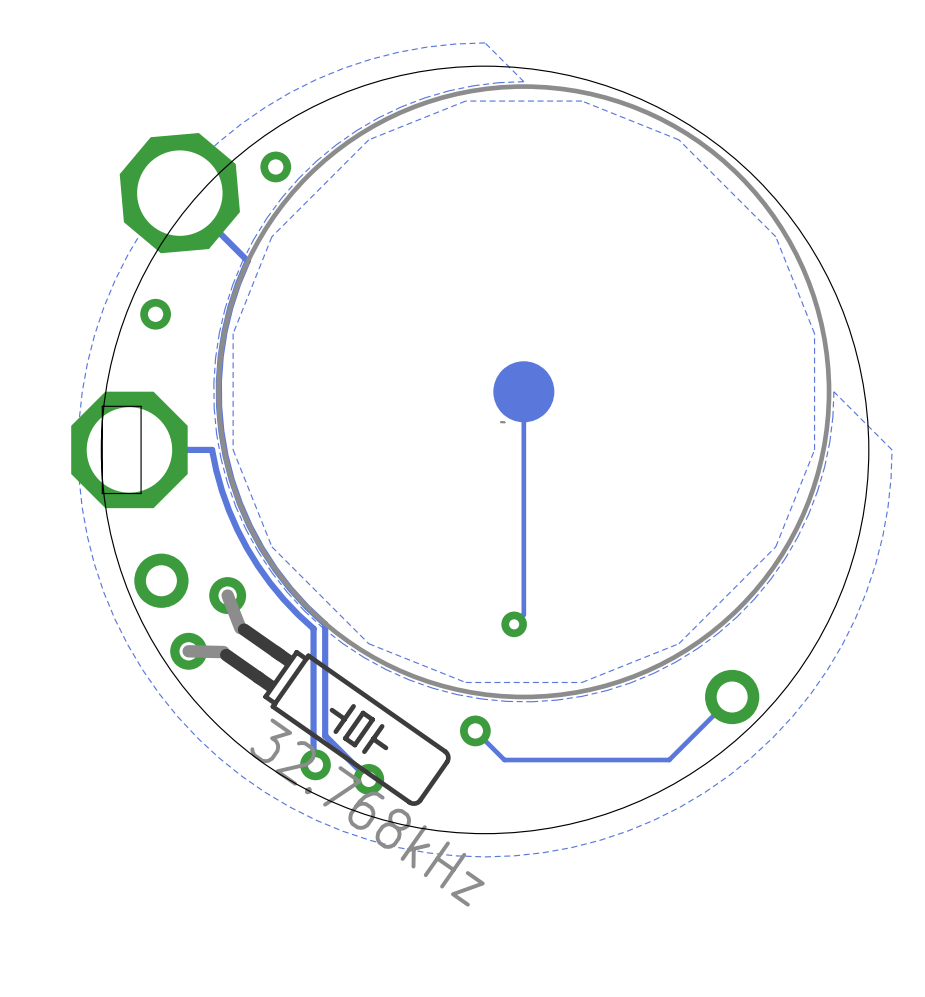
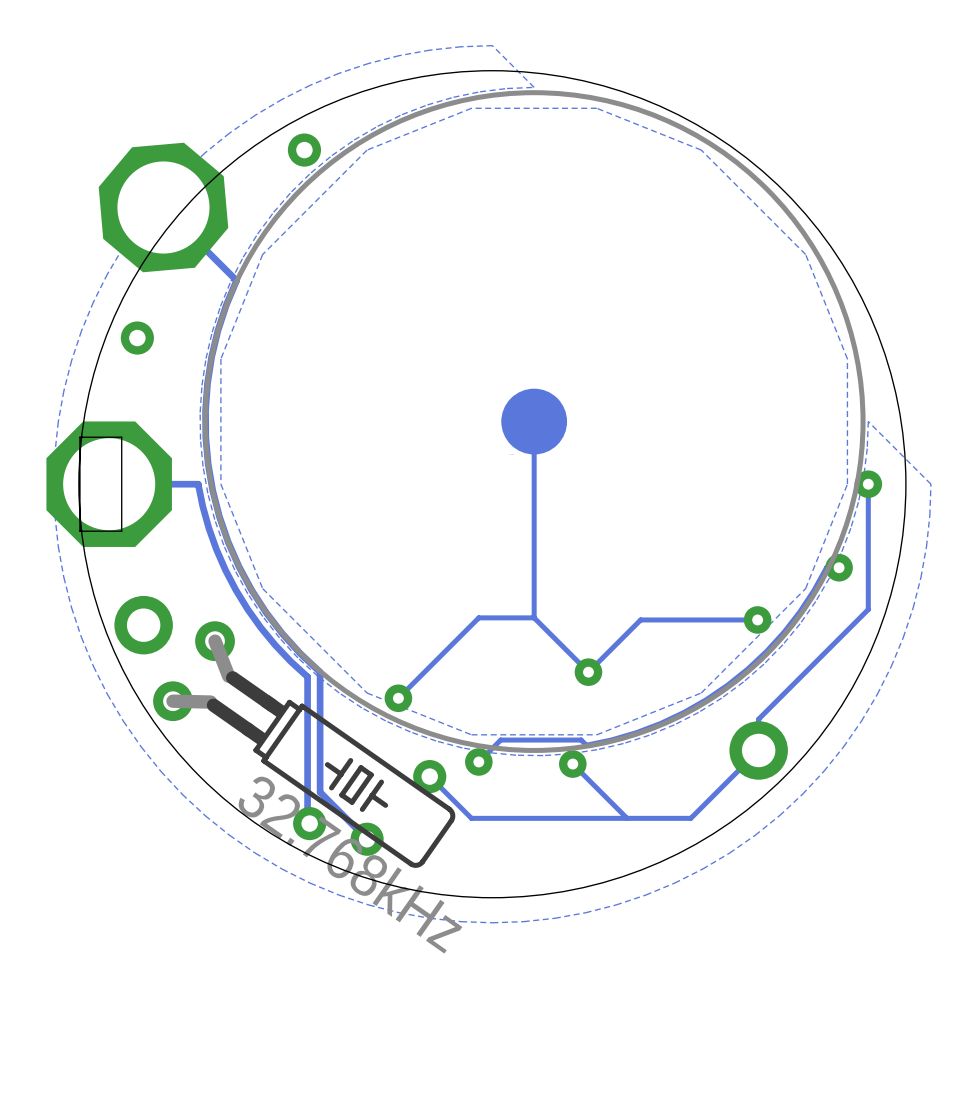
via position: (275, 166) -> (304, 150)
track: none -> (868, 484) (868, 609) (758, 719) (758, 750)
via: none -> (868, 484)
track: none -> (839, 567) (826, 567) (799, 611) (766, 651) (747, 669) (706, 699) (683, 712) (636, 732) (586, 745) (581, 740) (500, 740) (478, 761)
via: none -> (839, 567)
track: (523, 573) (523, 614) (514, 624) -> none
track: none -> (757, 619) (640, 619) (588, 672) (534, 617) (478, 617) (398, 698)
via: none -> (757, 619)
via: (514, 624) -> none
via: none -> (588, 672)
via: none -> (398, 698)
via: none -> (478, 761)
track: none -> (572, 764) (627, 818)
via: none -> (572, 764)
track: (475, 730) (504, 760) -> (429, 776) (471, 818) (513, 818)
via position: (475, 730) -> (429, 776)

